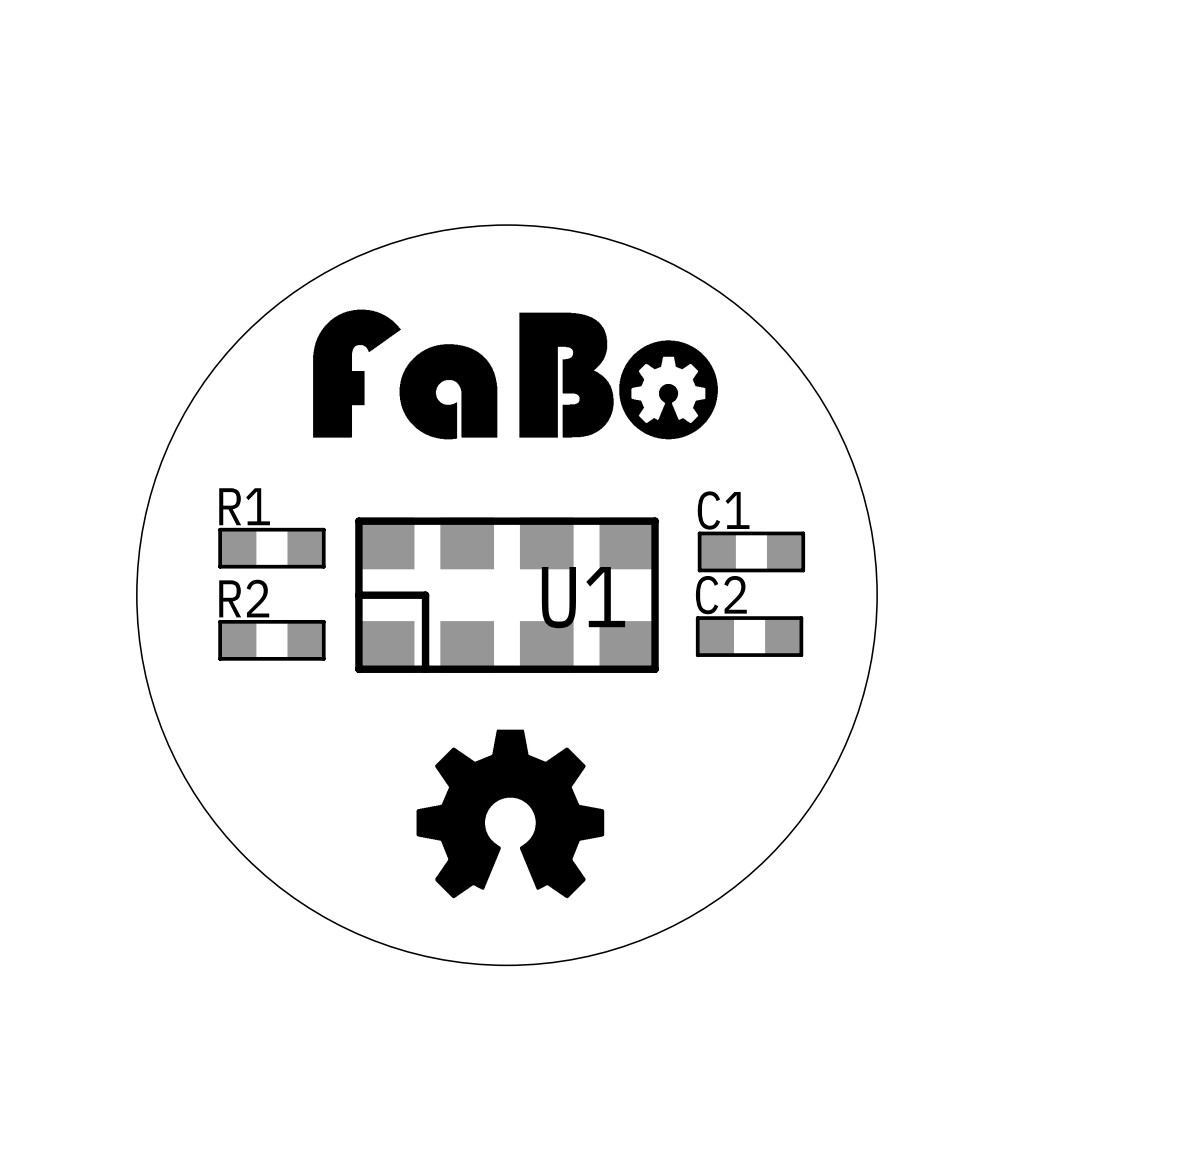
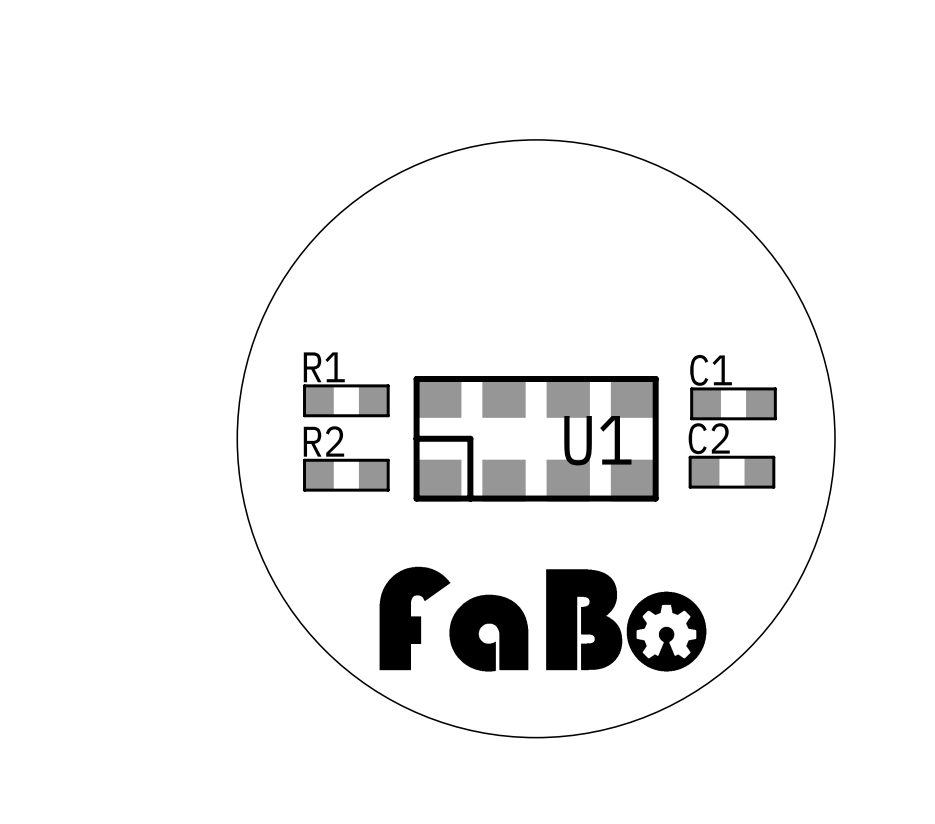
drawing position: (515, 374) -> (543, 619)
drawing: [416, 729, 605, 899] -> none

